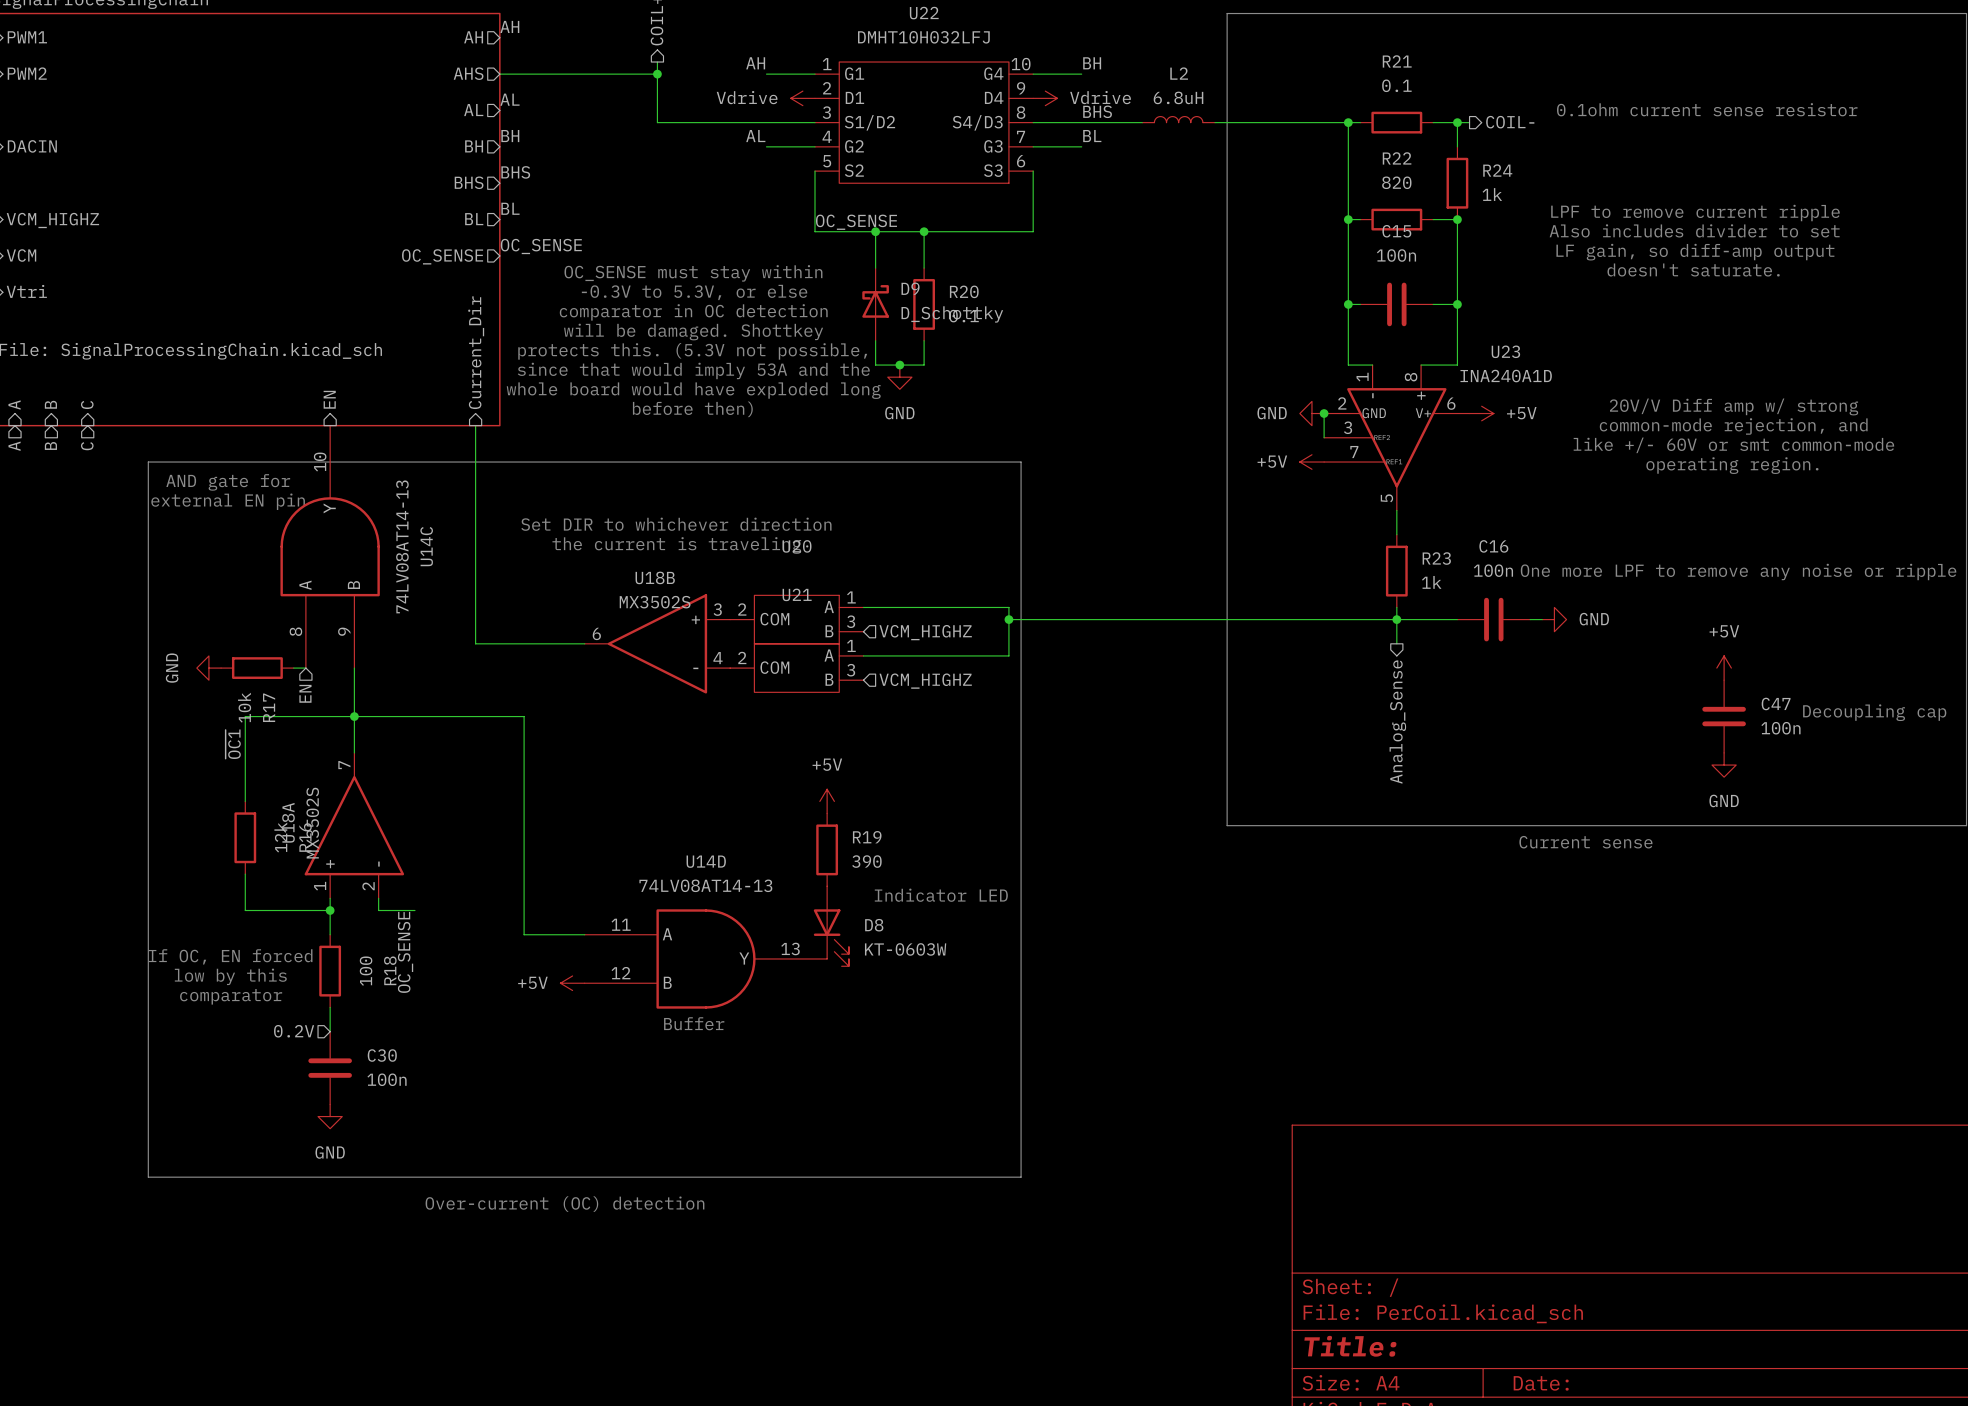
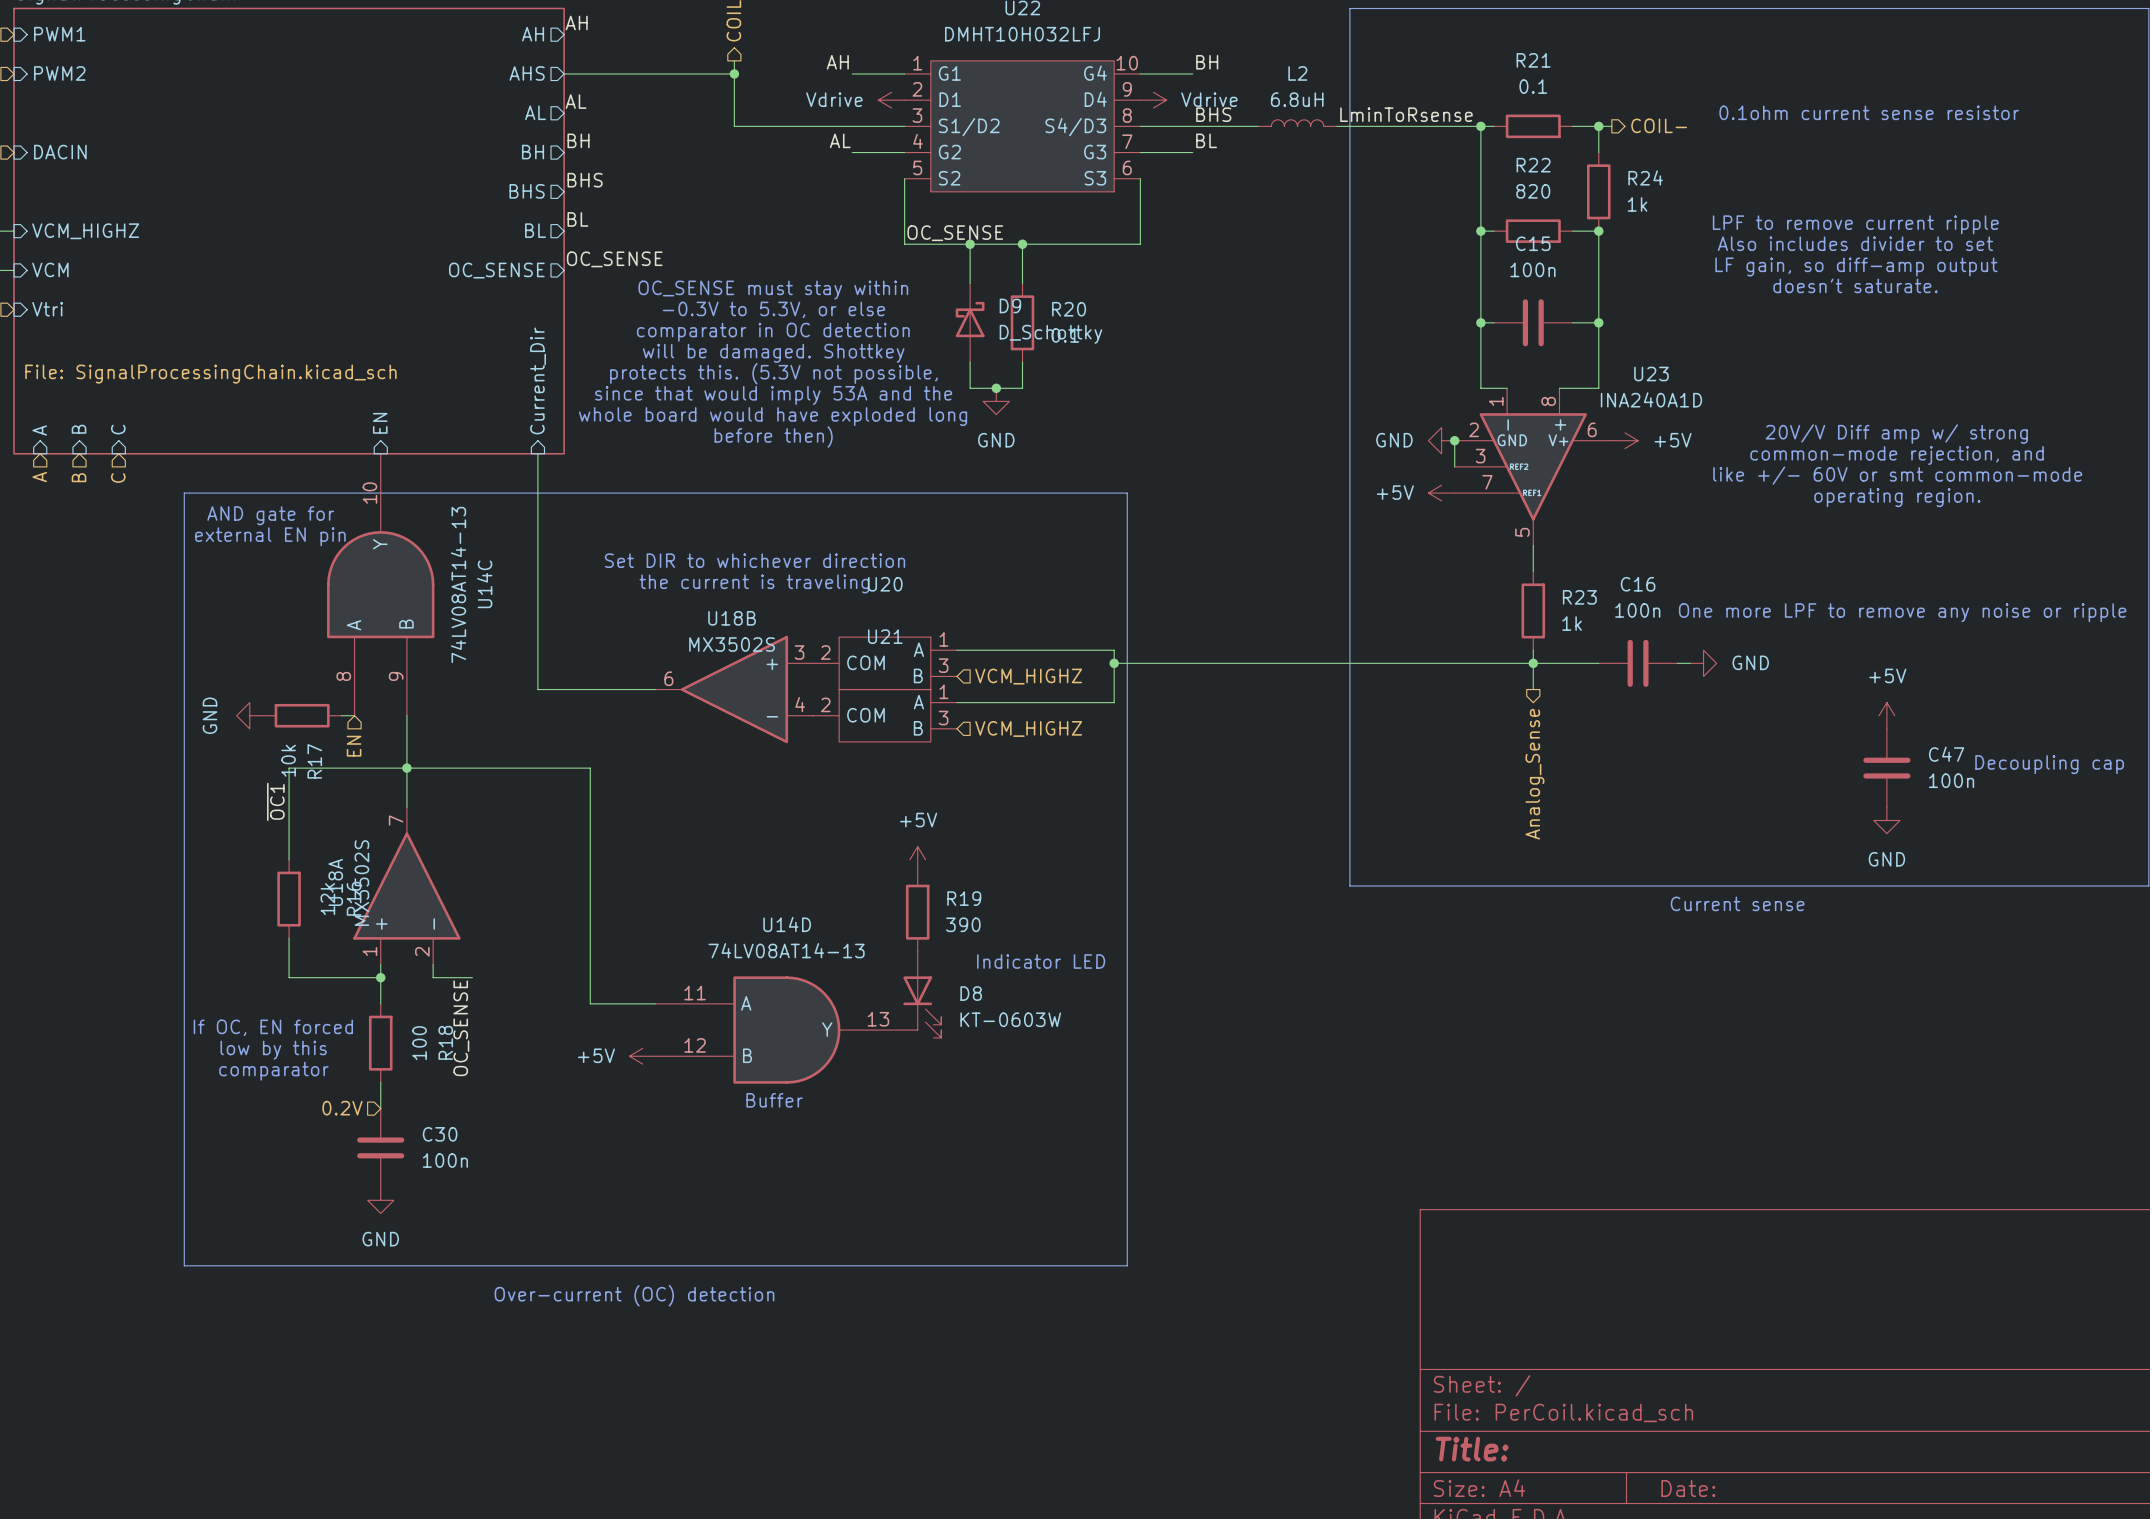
label: none -> LminToRsense (1406, 114)

